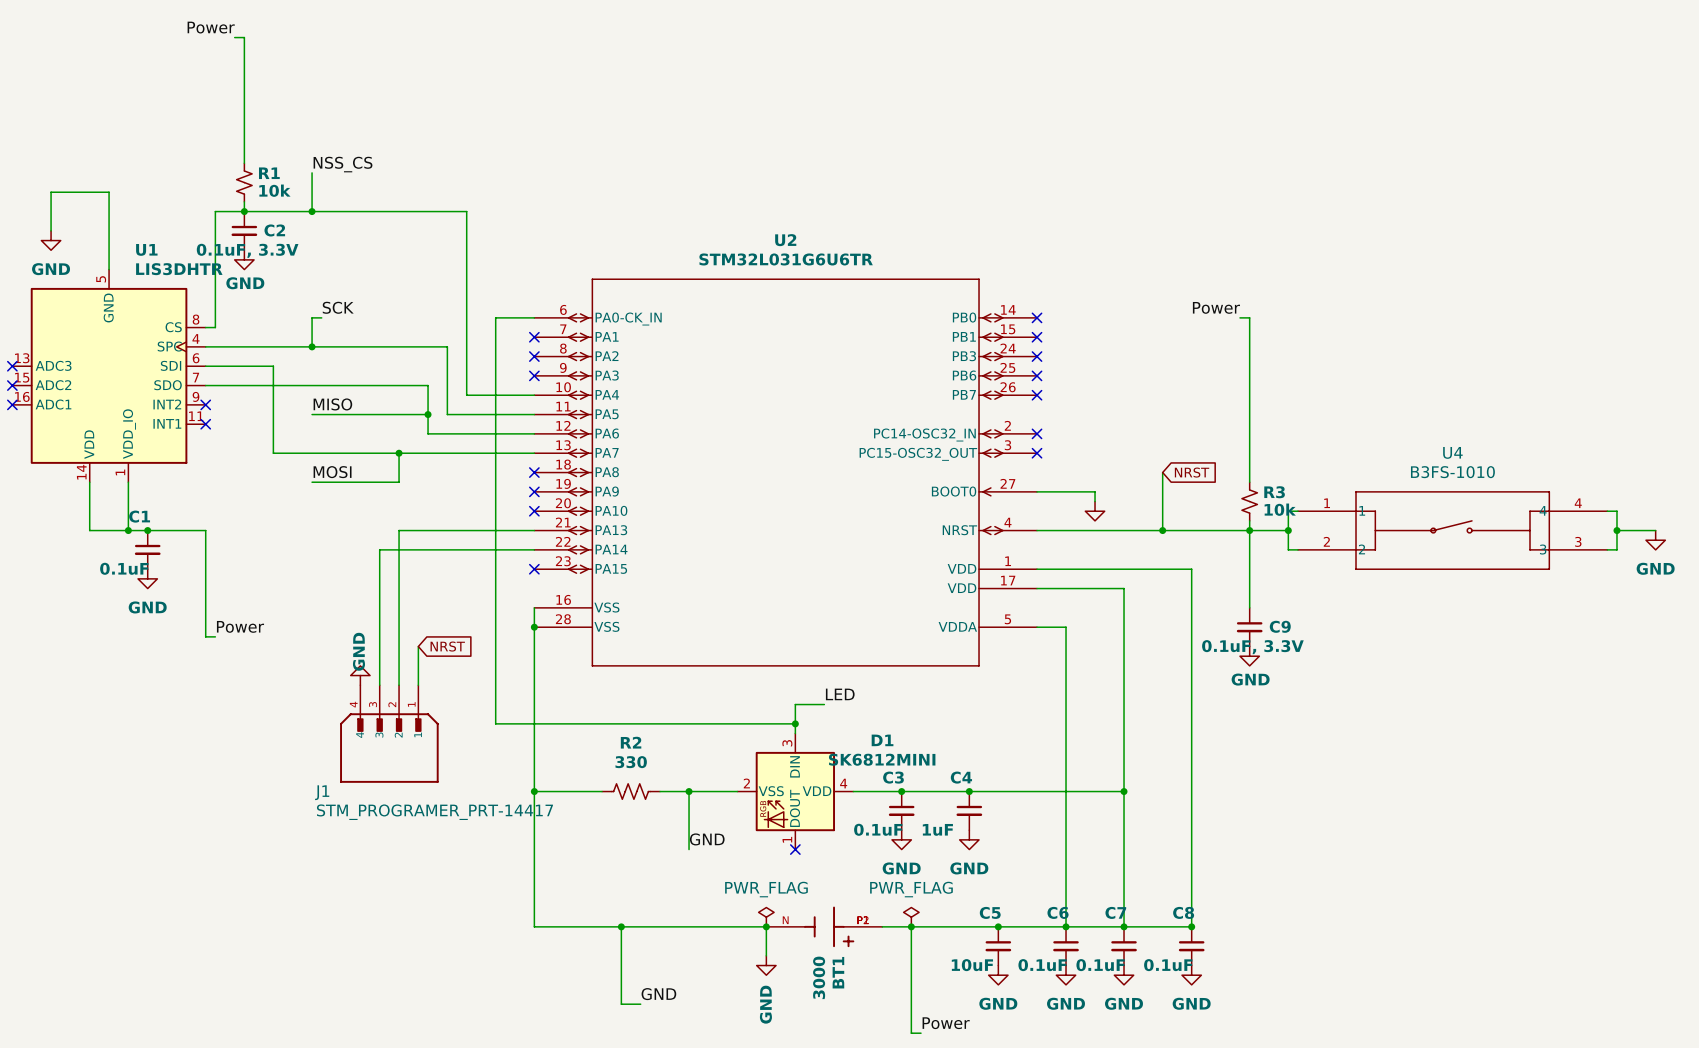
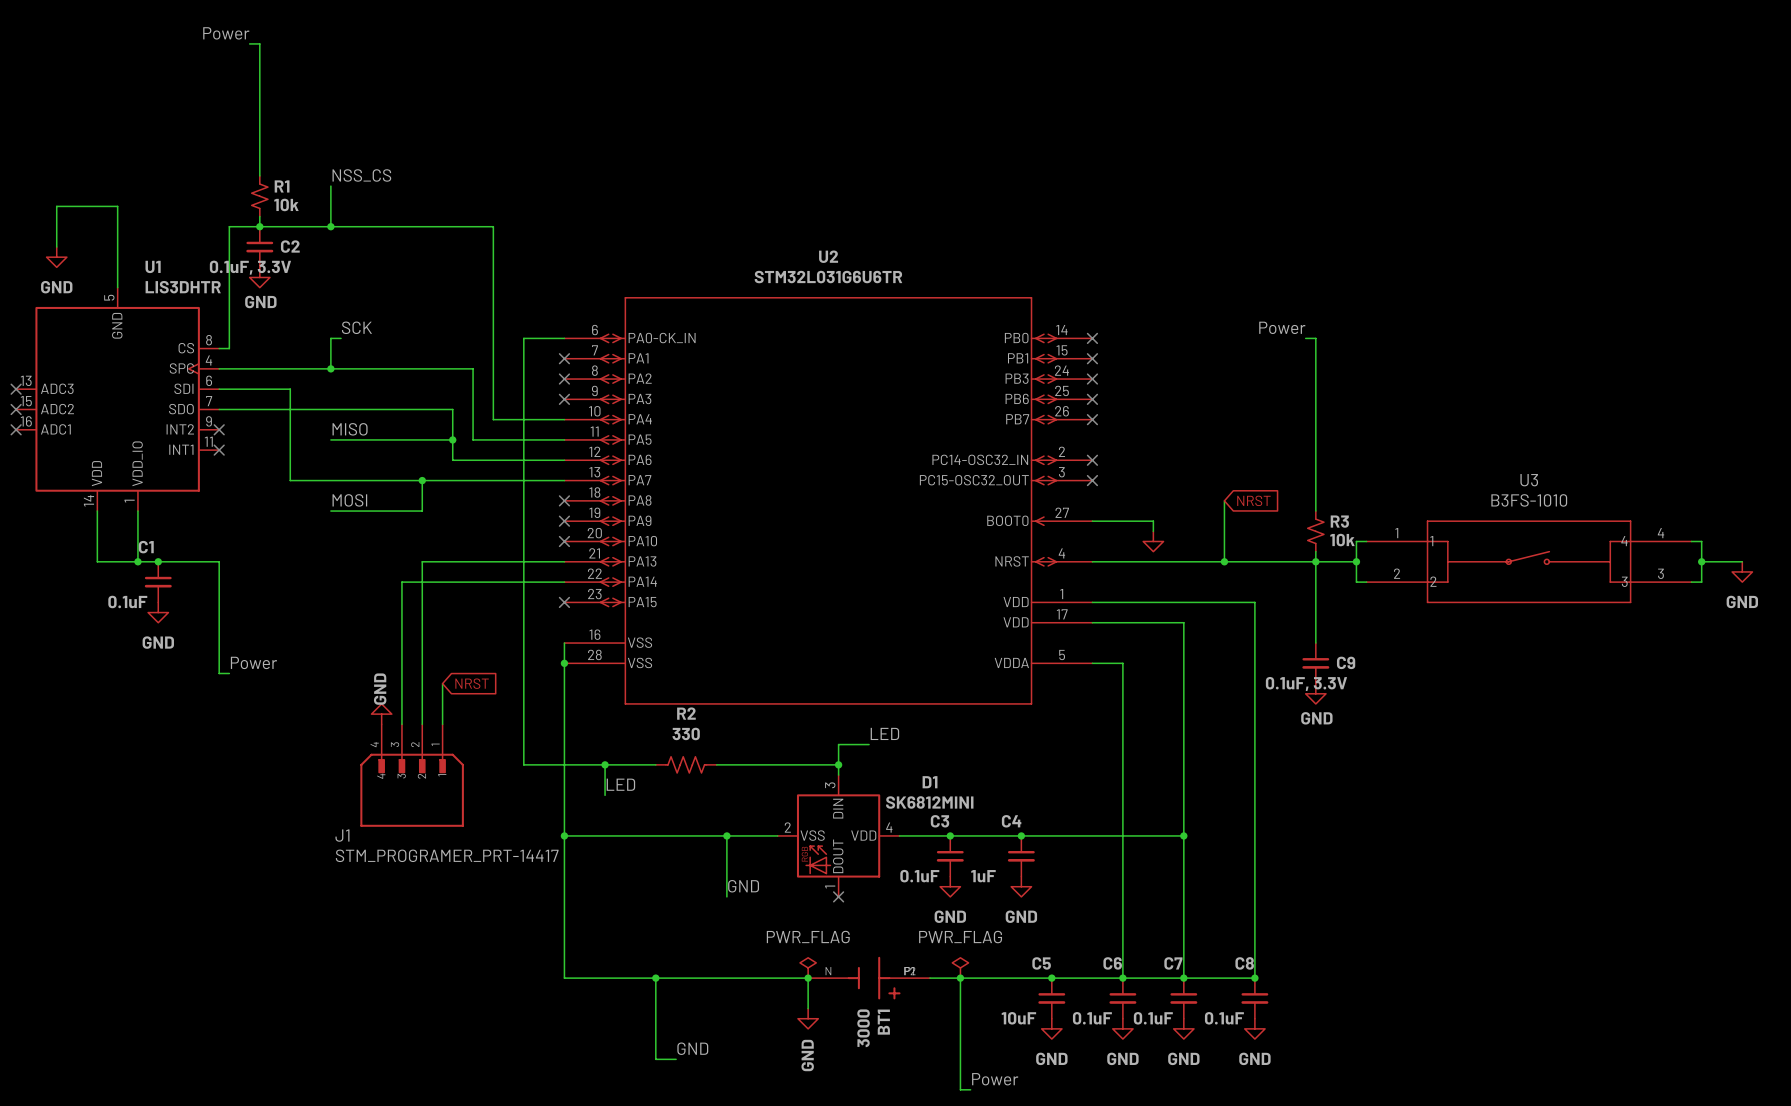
U4 name: U4 (1452, 452) -> U3 (1529, 480)
wire: none -> (605, 764) (605, 795)
junction: none -> (605, 764)
label: none -> LED (620, 784)
R2 position: (631, 791) -> (686, 764)

